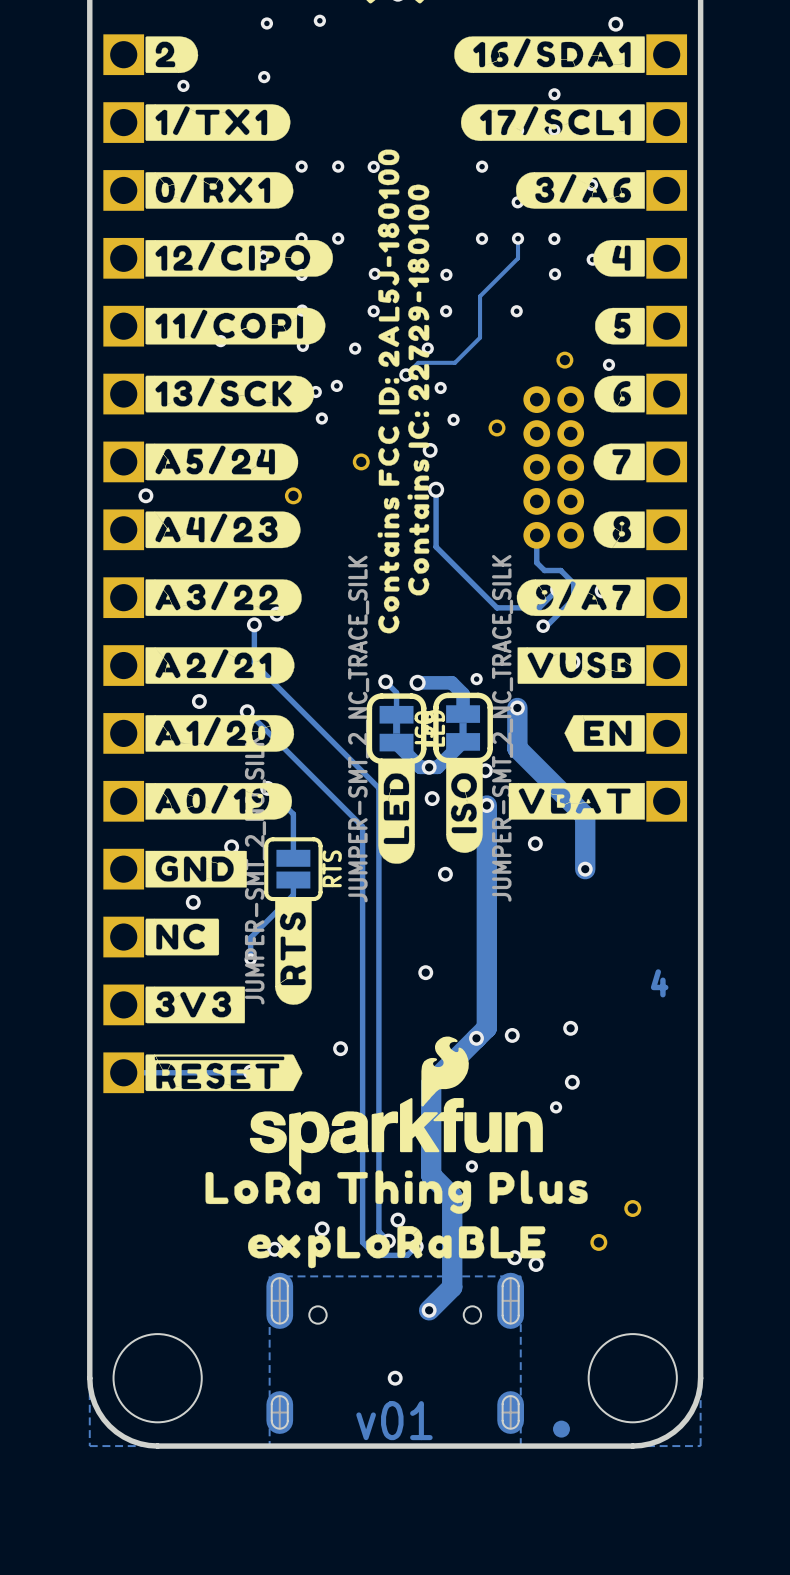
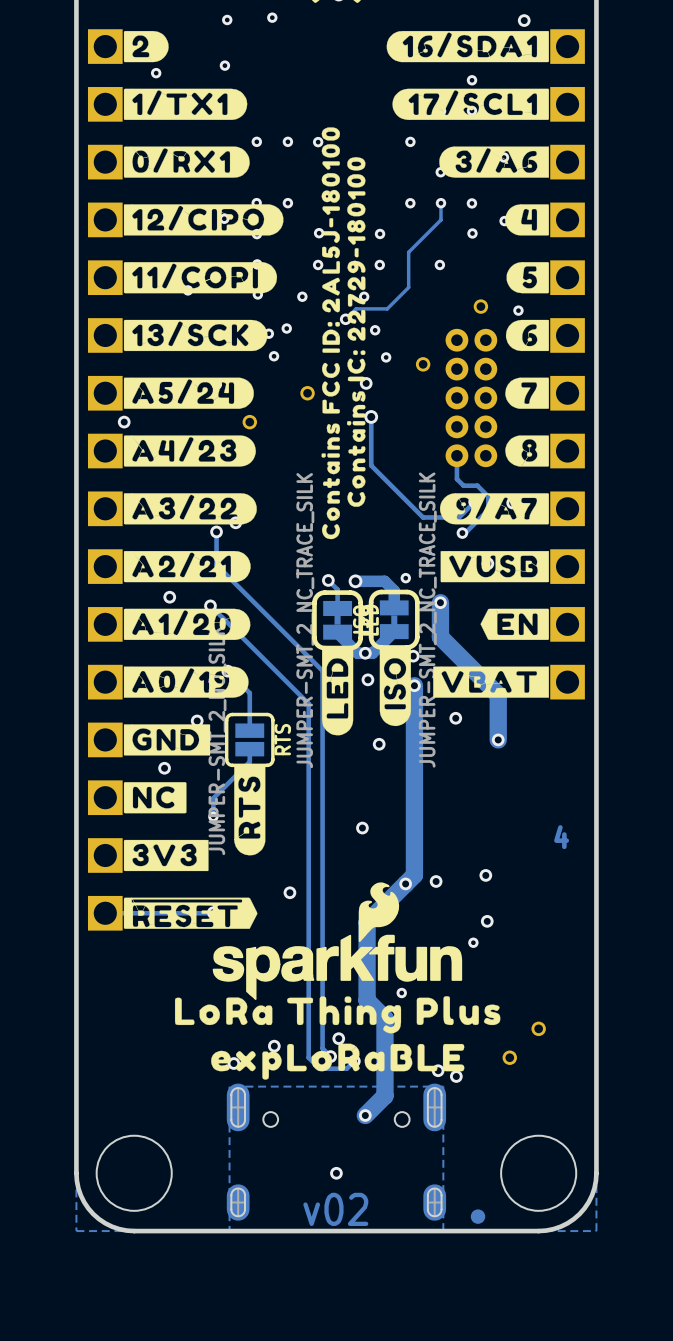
text: v01 (394, 1420) -> v02 (335, 1209)

